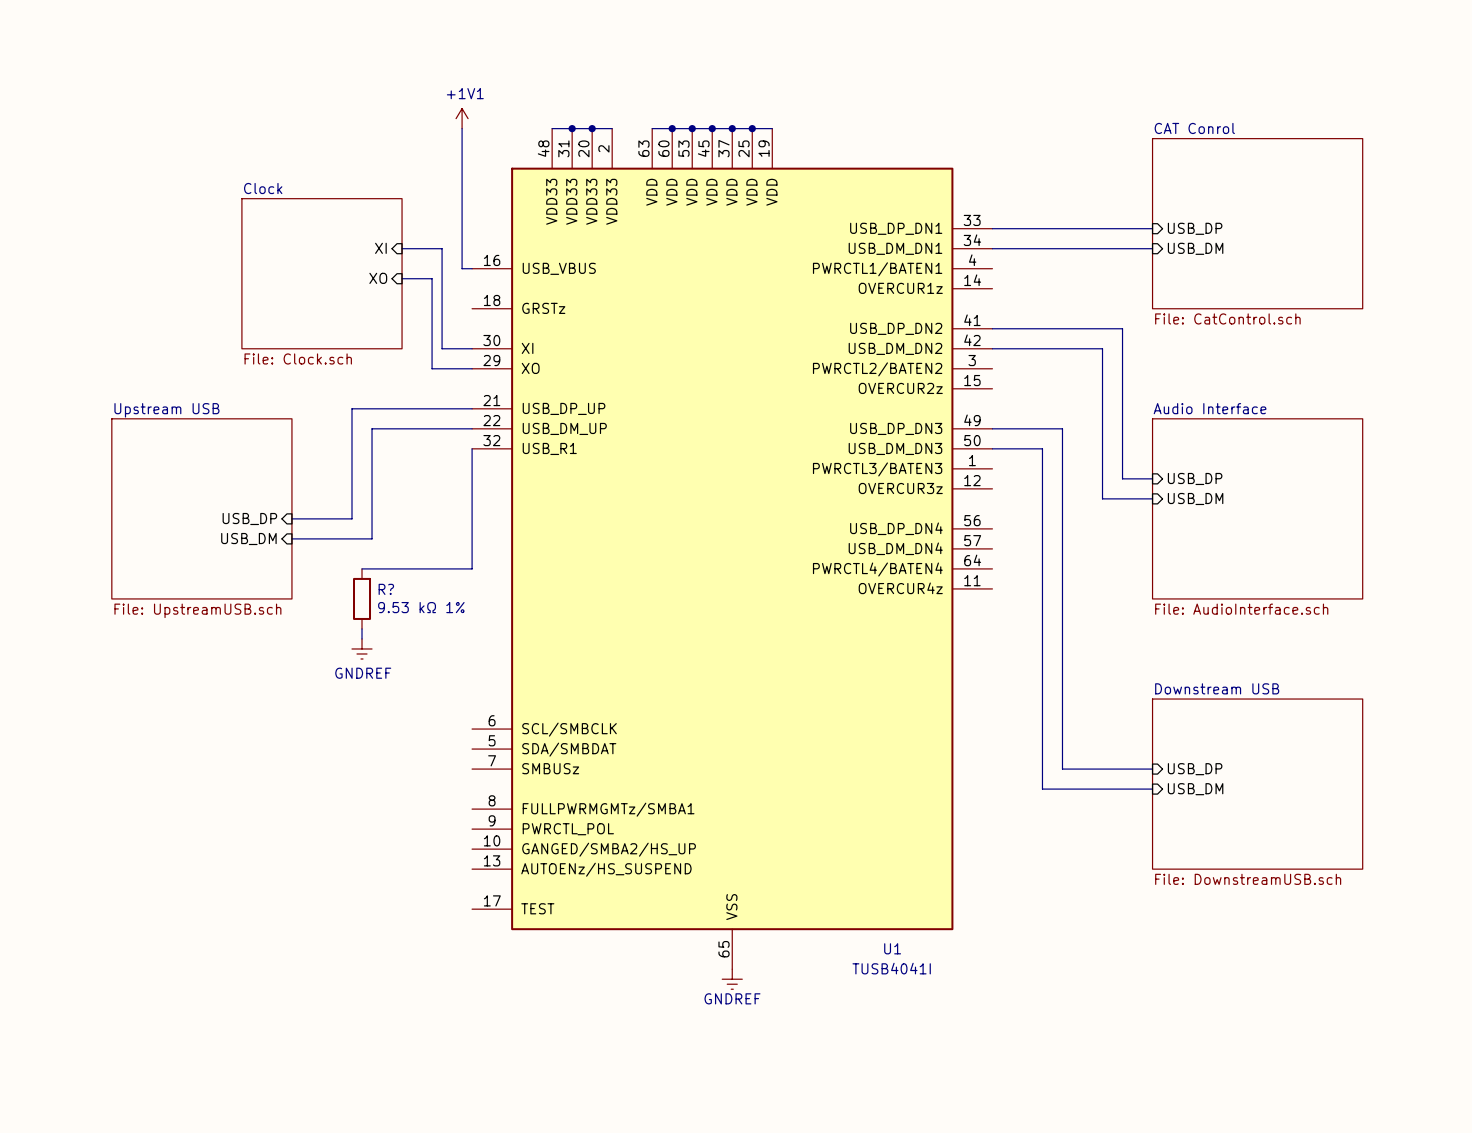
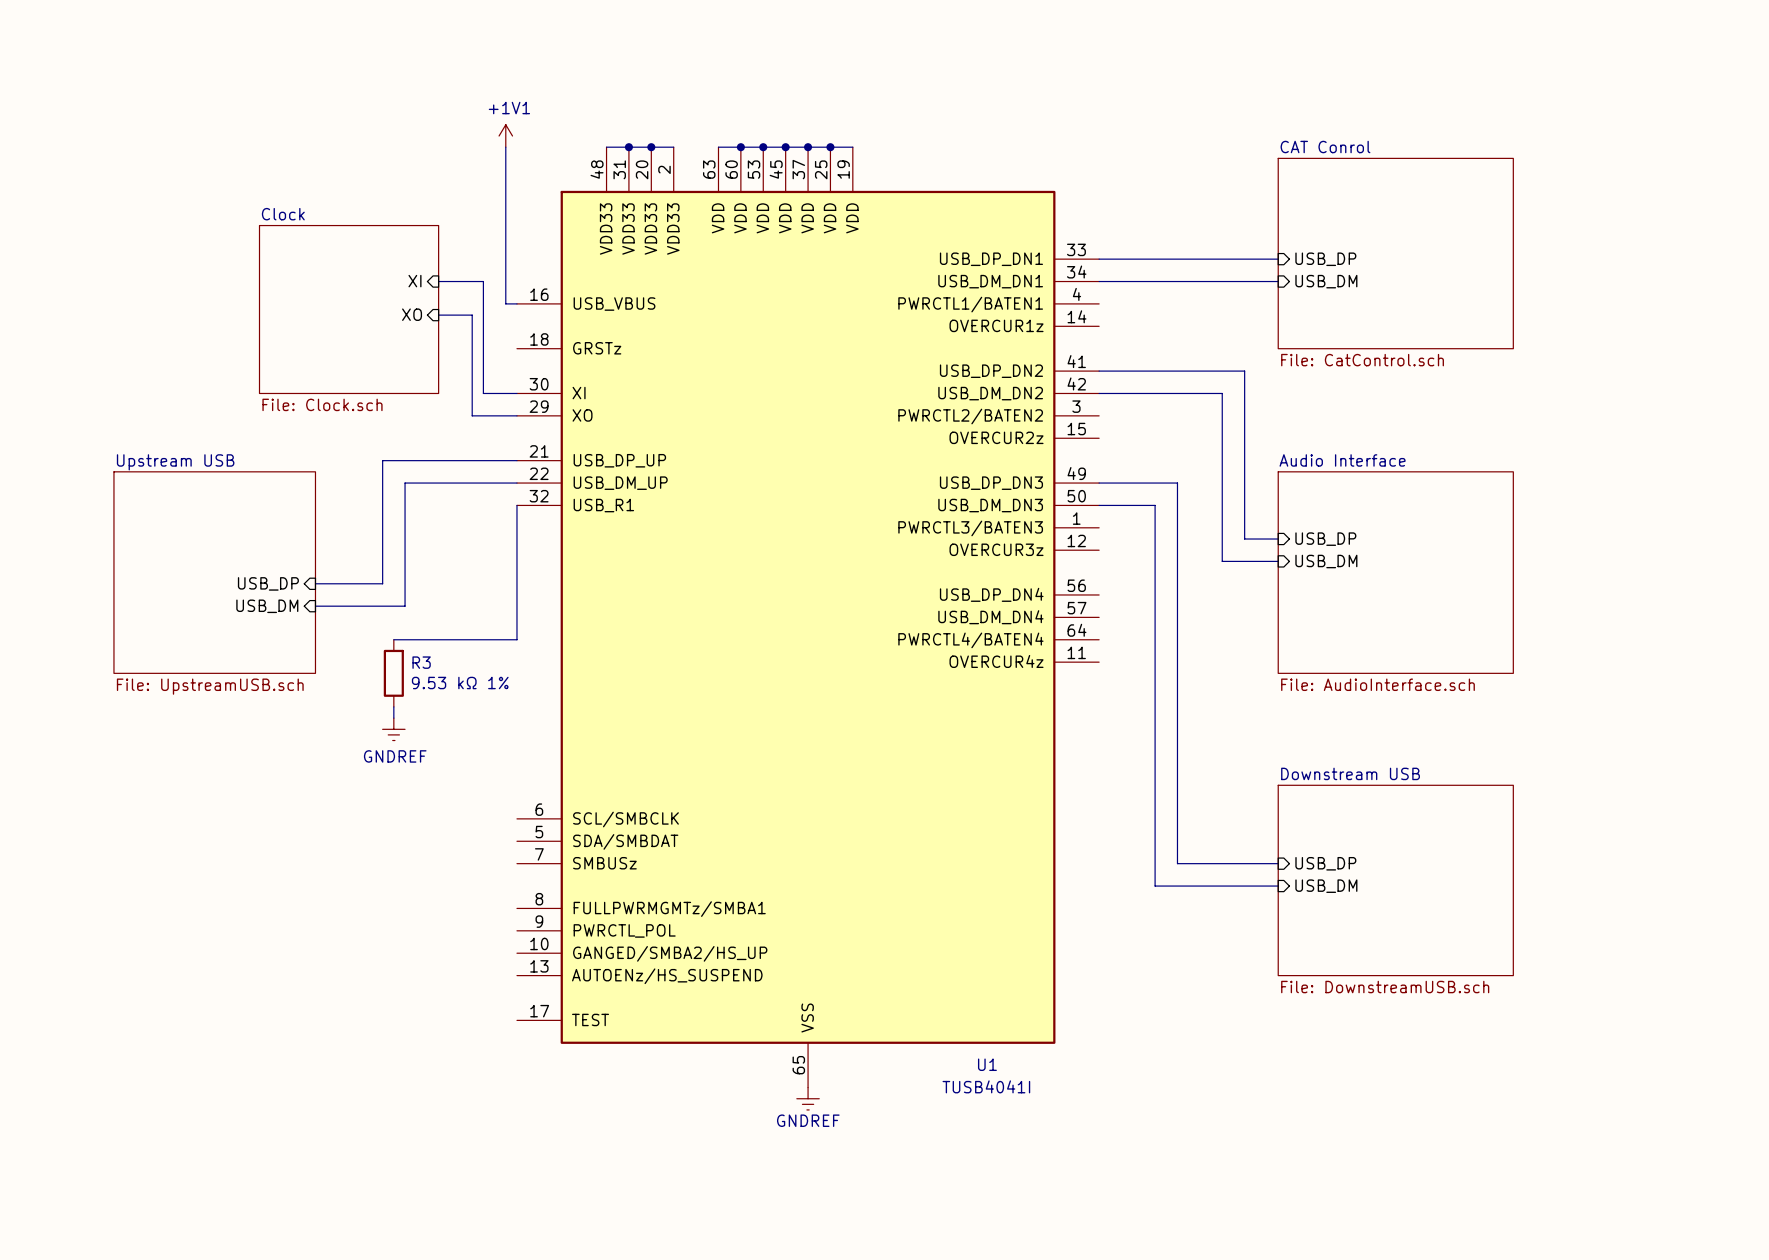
R? name: R? (386, 589) -> R3 (421, 662)

